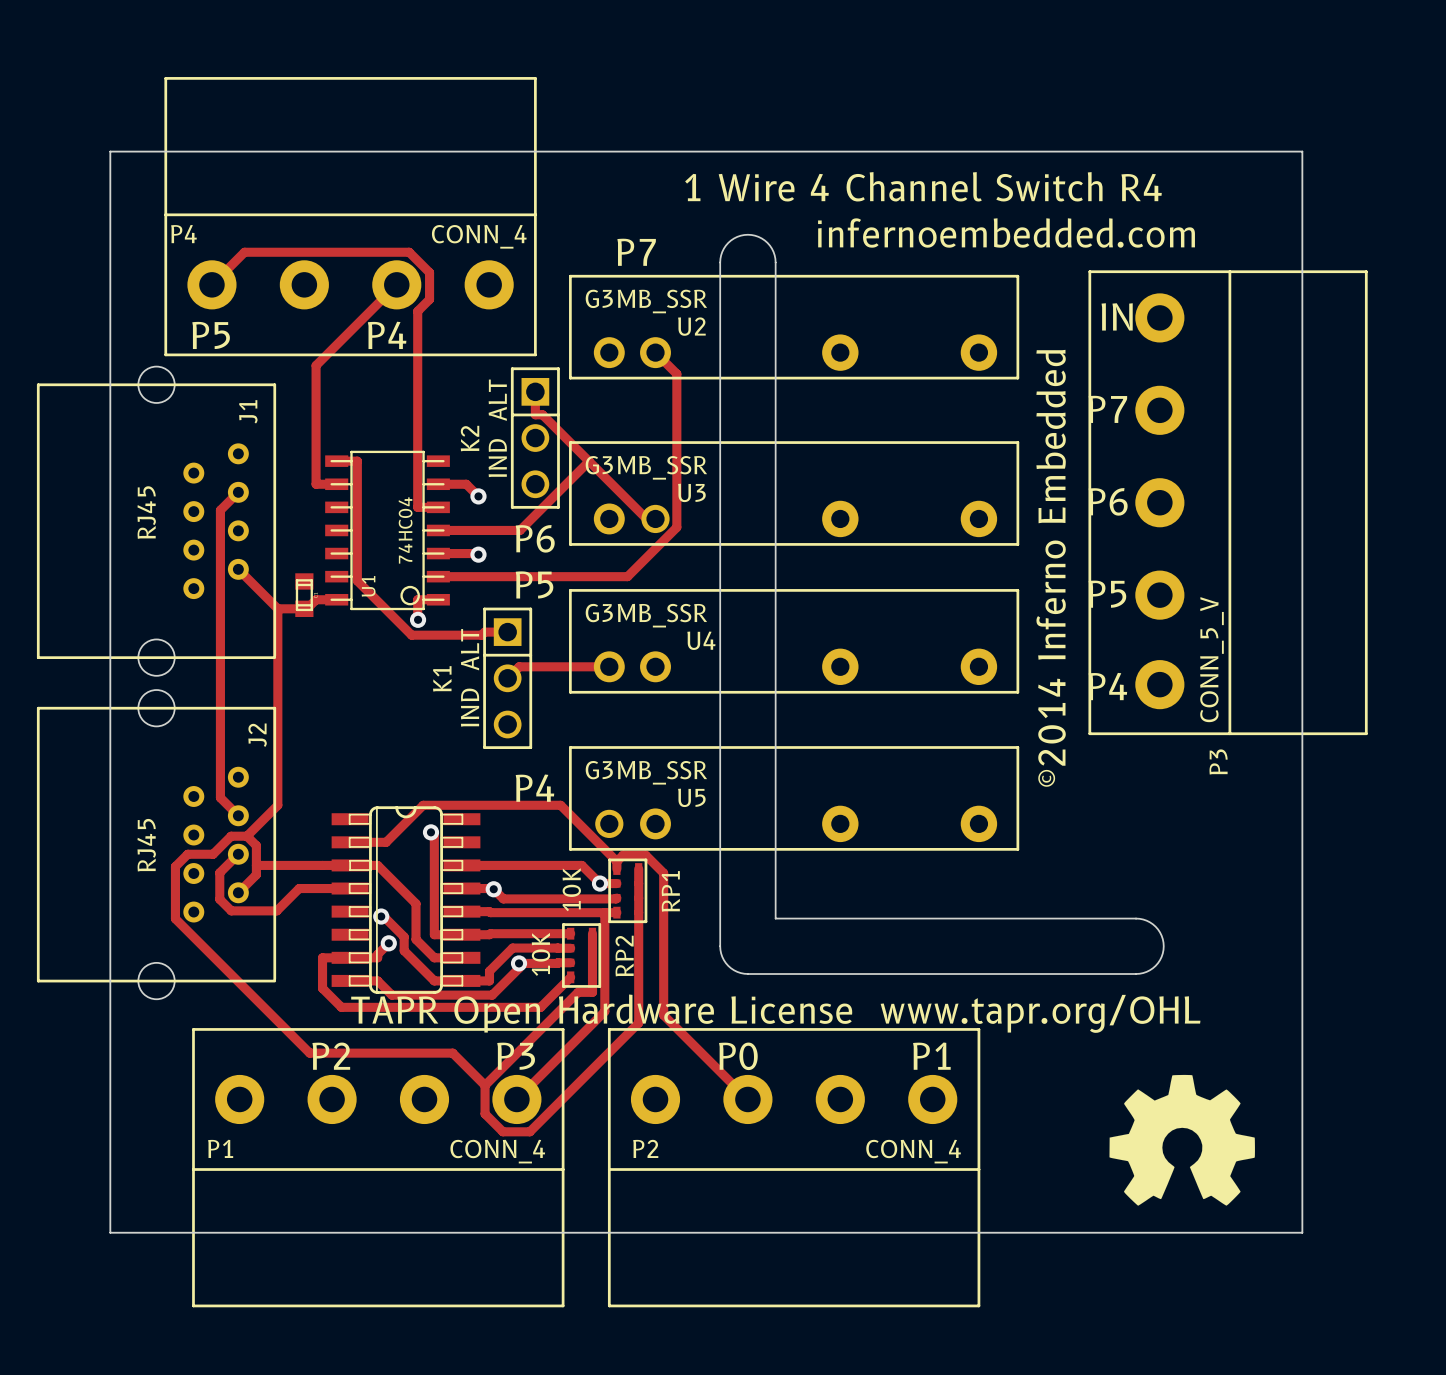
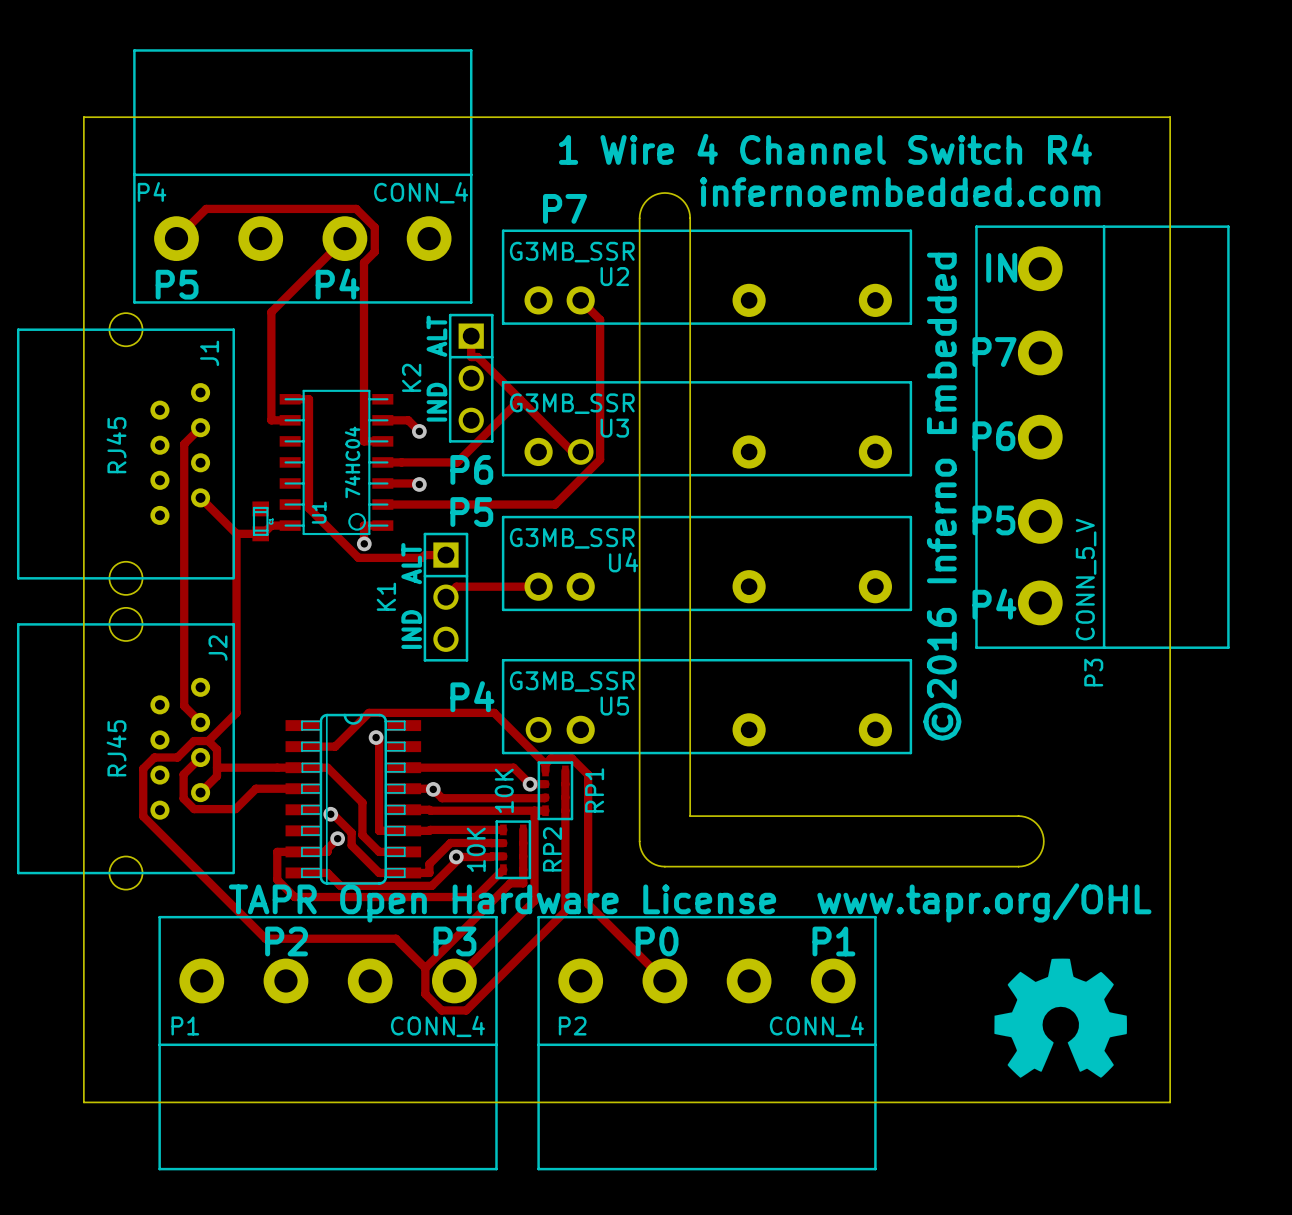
text: ©2014 Inferno Embedded (1051, 568) -> ©2016 Inferno Embedded (942, 496)

